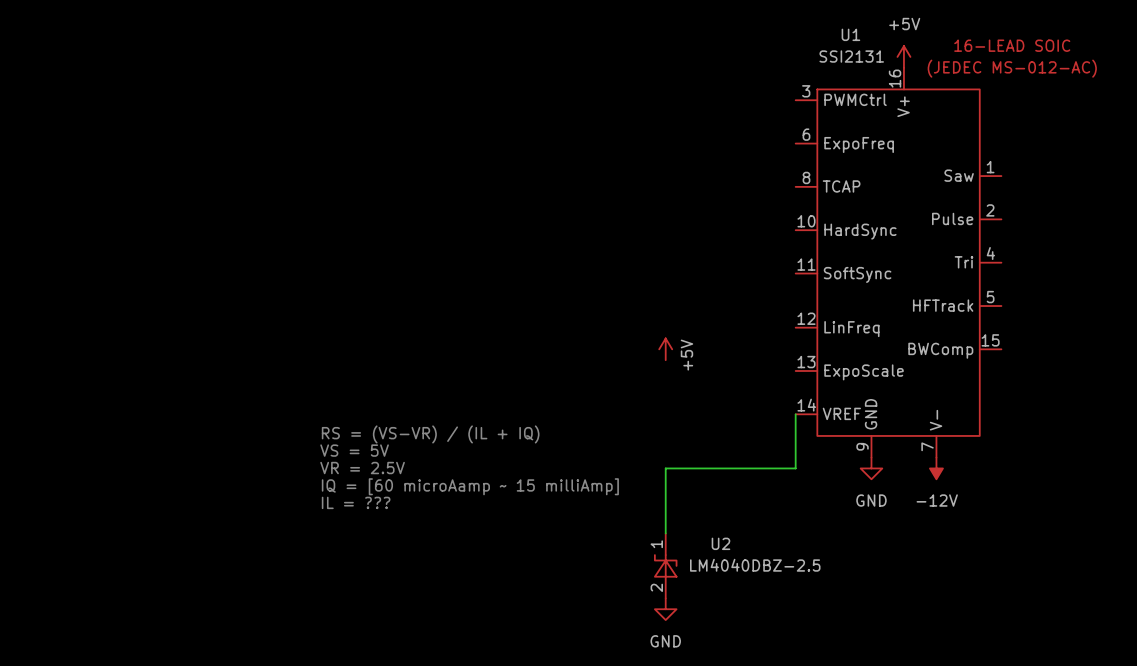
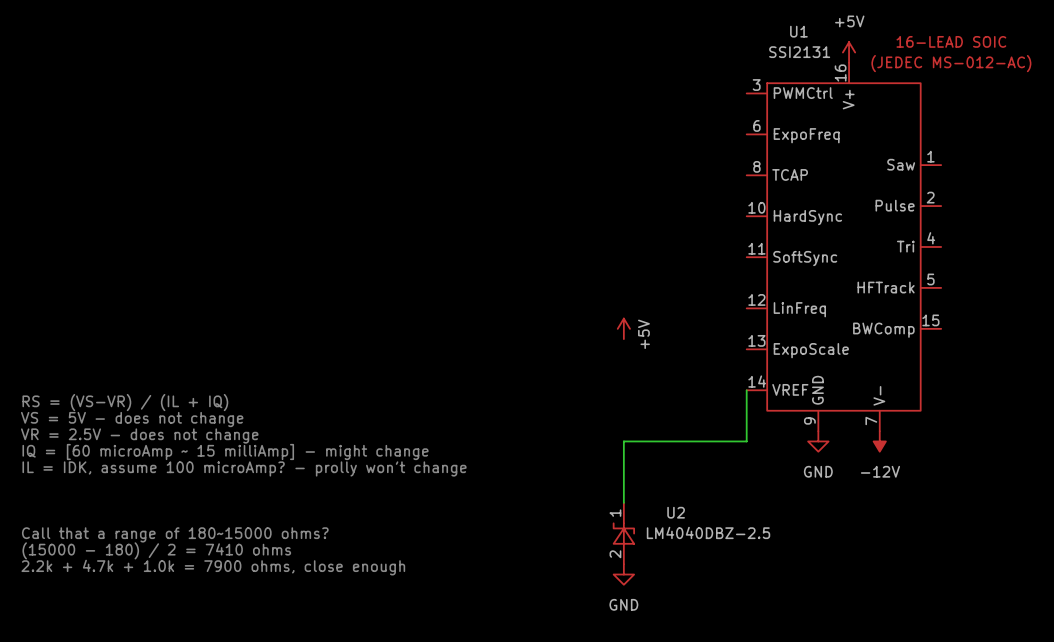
text: none -> RS = (VS-VR) / (IL + IQ) (125, 402)
text: RS = (VS-VR) / (IL + IQ) (430, 434) -> none
text: none -> VS = 5V - does not change (132, 419)
text: VS = 5V (354, 450) -> none
text: none -> VR = 2.5V - does not change (139, 436)
text: VR = 2.5V (362, 468) -> none
text: none -> IQ = [60 microAmp ~ 15 milliAmp] - might change (225, 451)
text: IQ = [60 microAamp ~ 15 milliAmp] (470, 486) -> none
text: none -> IL = IDK, assume 100 microAmp? - prolly won't change (244, 468)
text: IL = ??? (356, 502) -> none
text: none -> Call that a range of 180~15000 ohms? (175, 534)
text: none -> (15000 - 180) / 2 = 7410 ohms (156, 550)
text: none -> 2.2k + 4.7k + 1.0k = 7900 ohms, close enough (213, 567)

